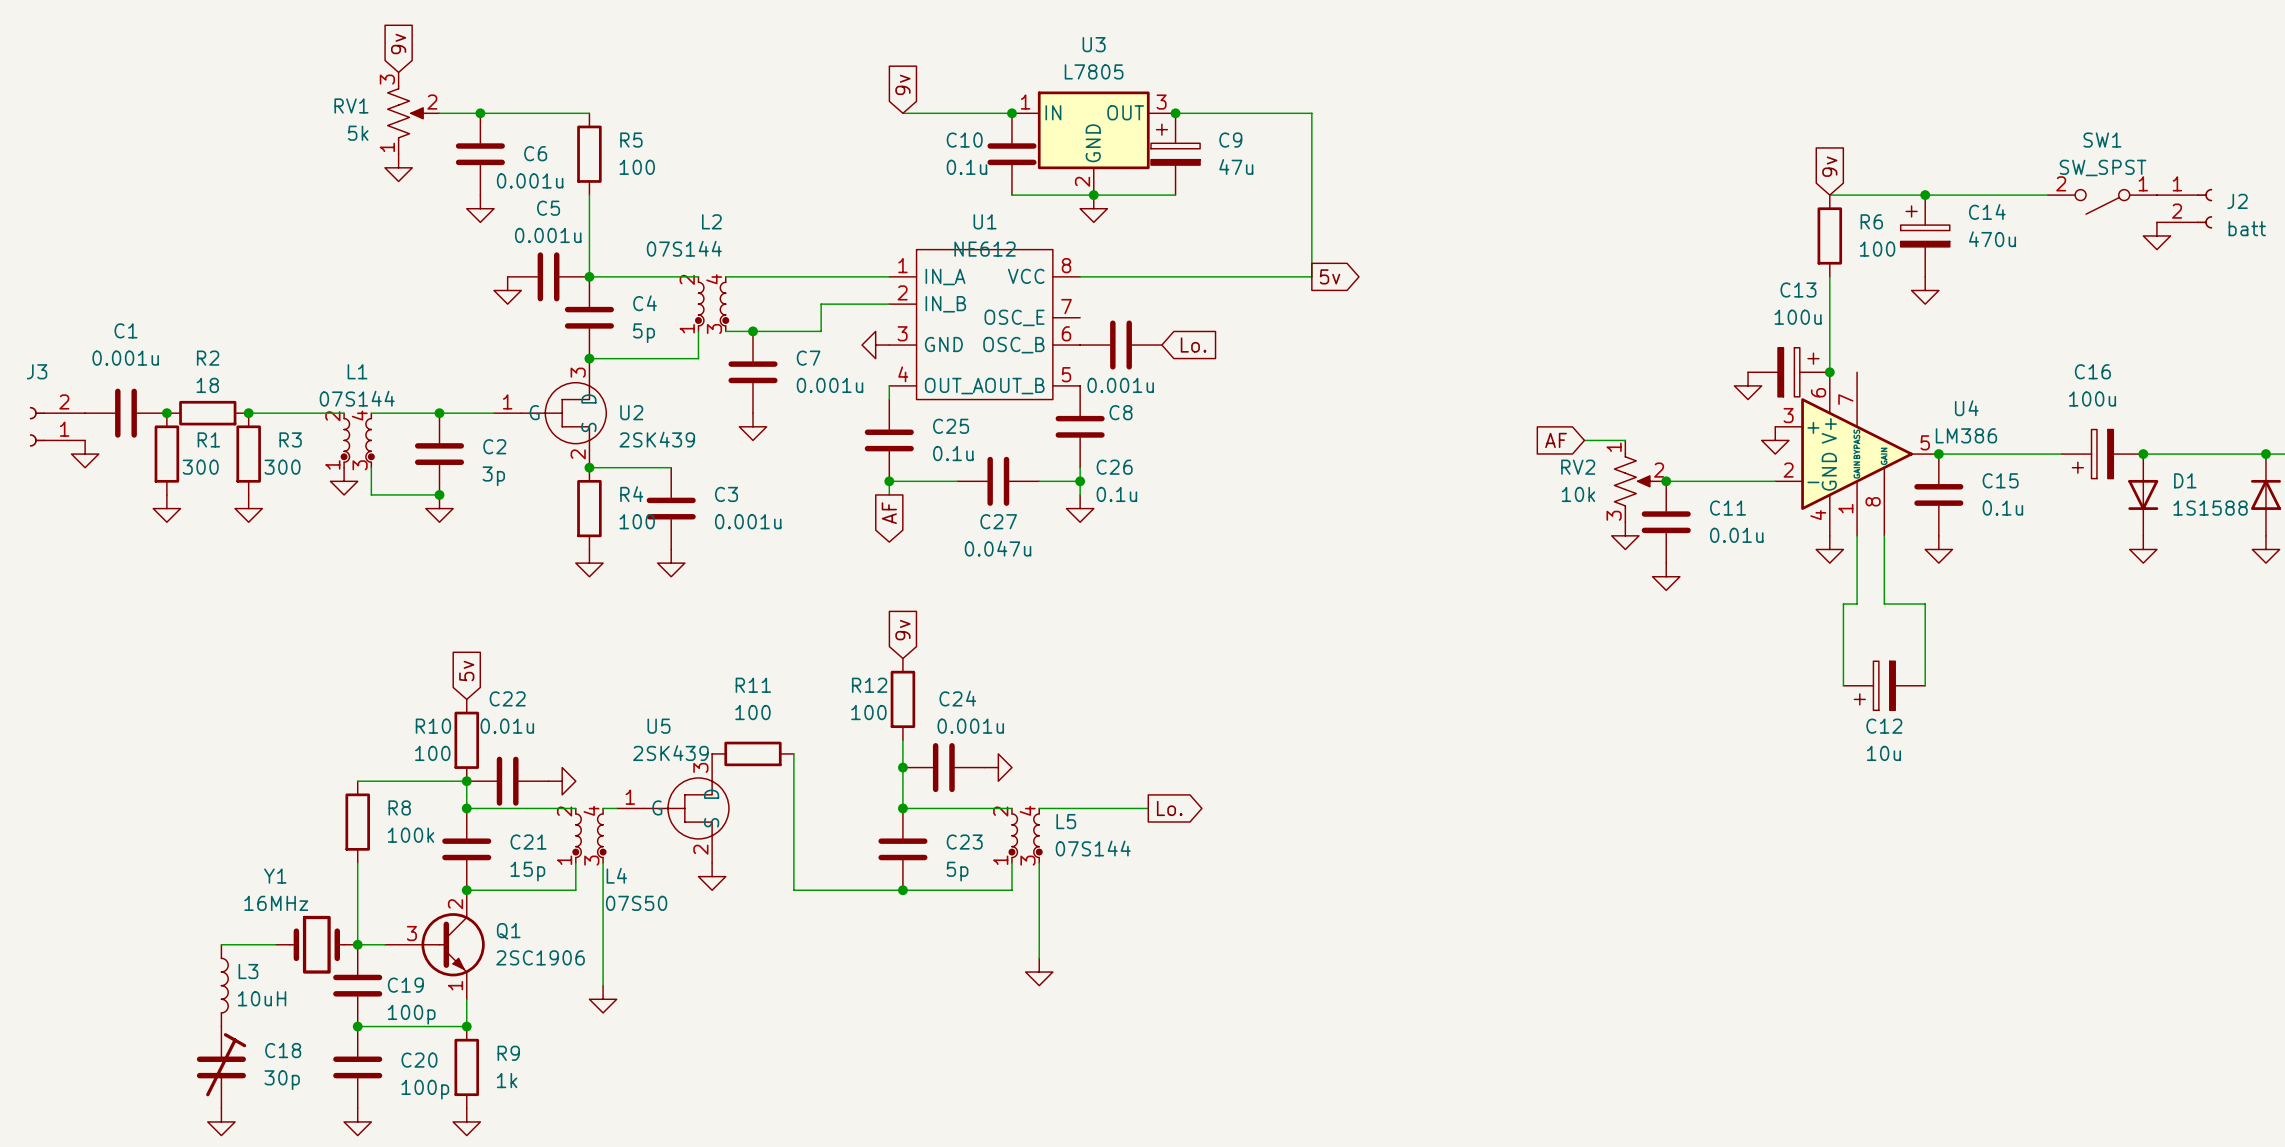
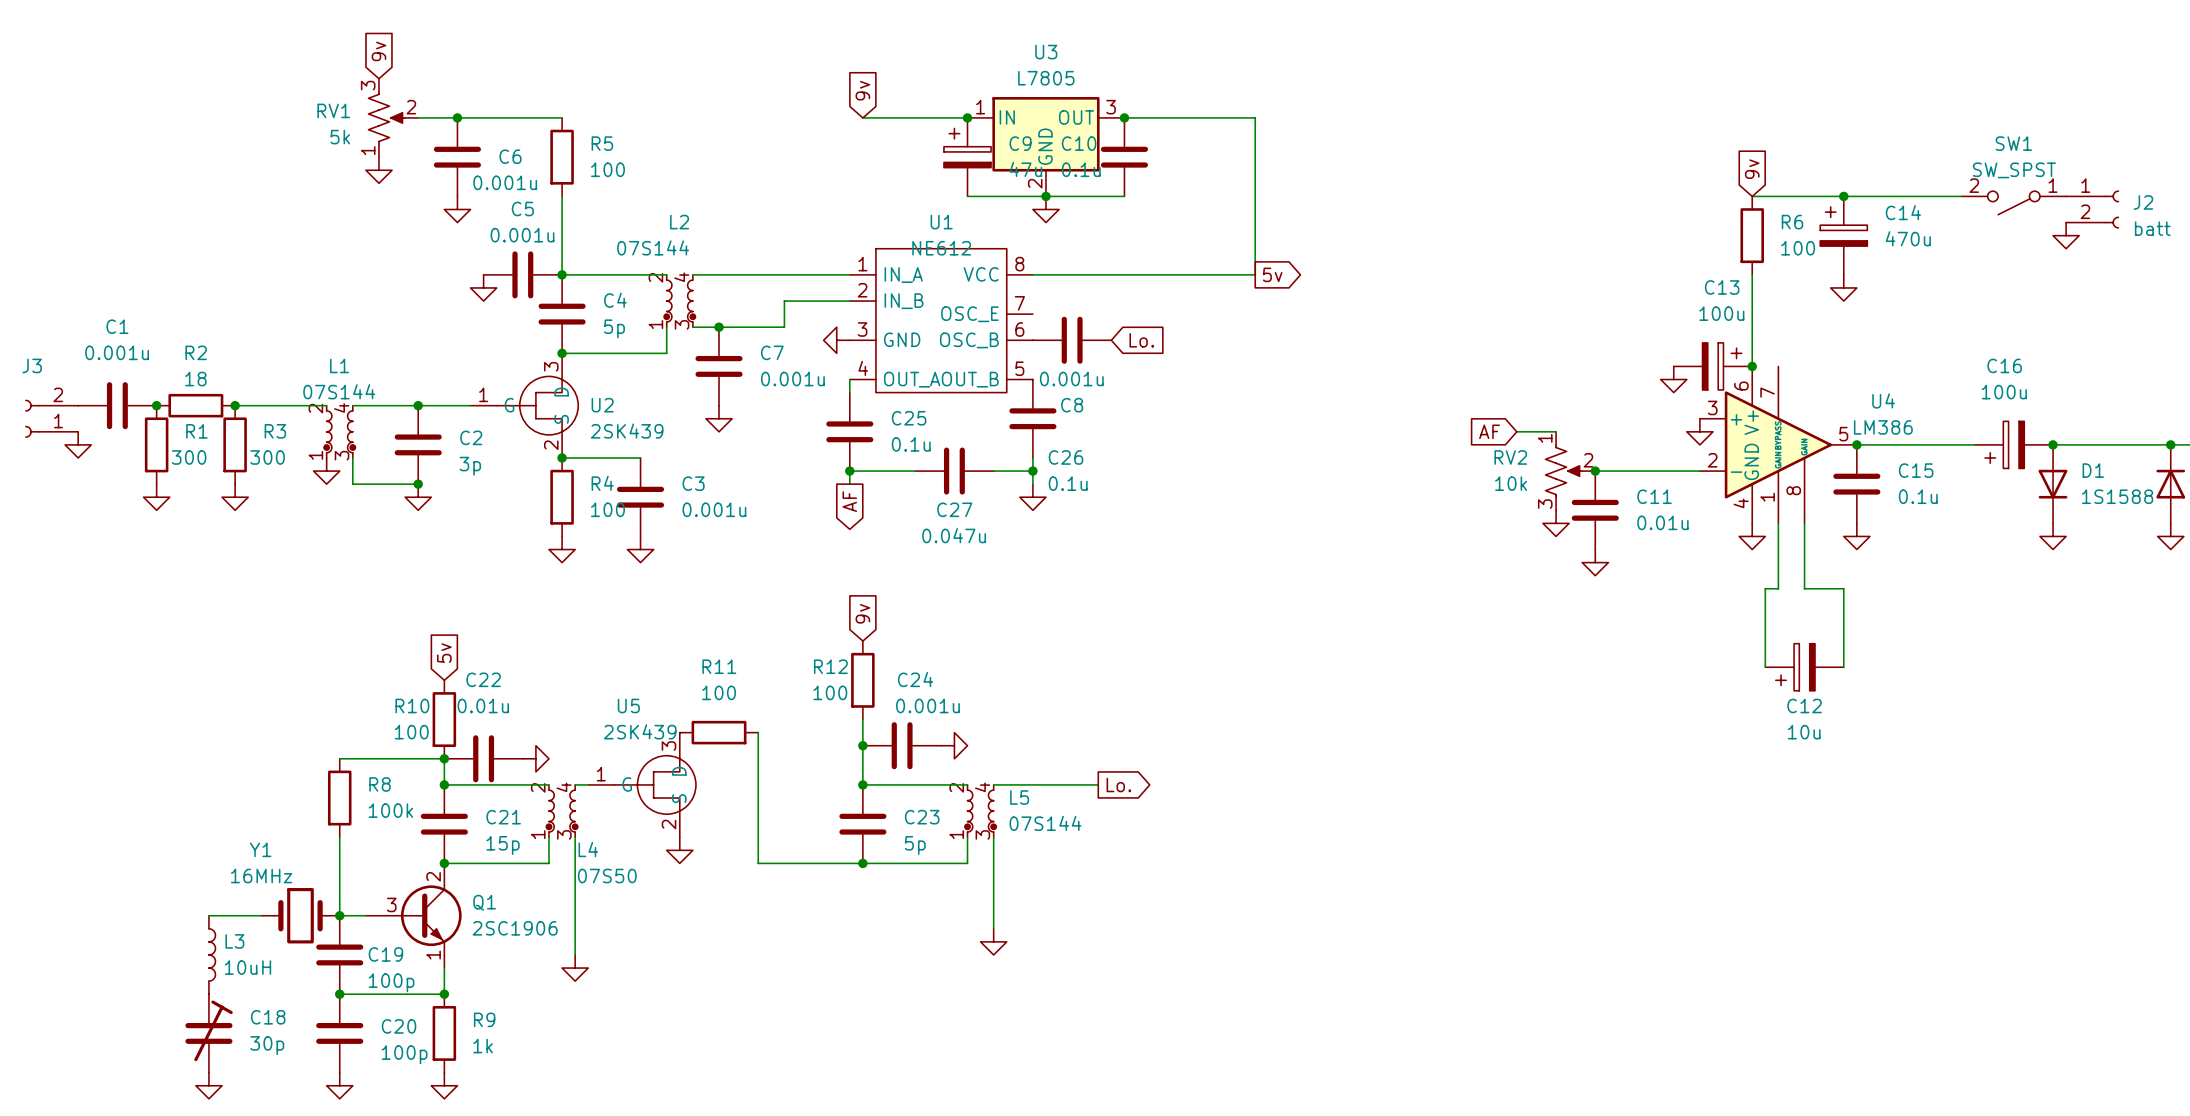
C10 position: (1011, 154) -> (1124, 157)
C9 position: (1175, 154) -> (967, 157)

